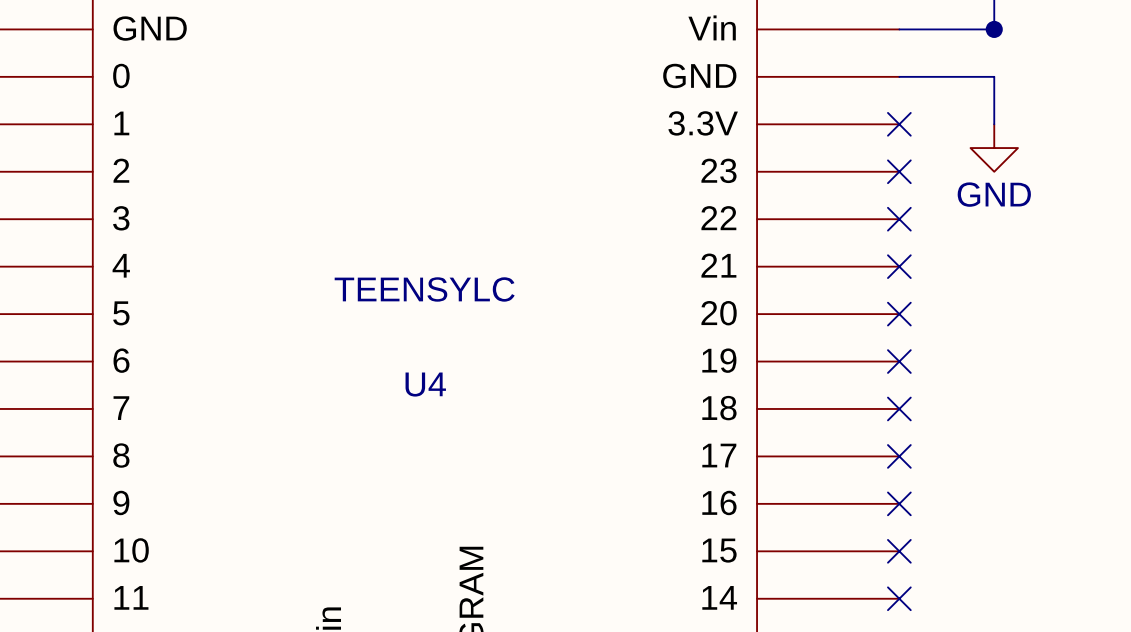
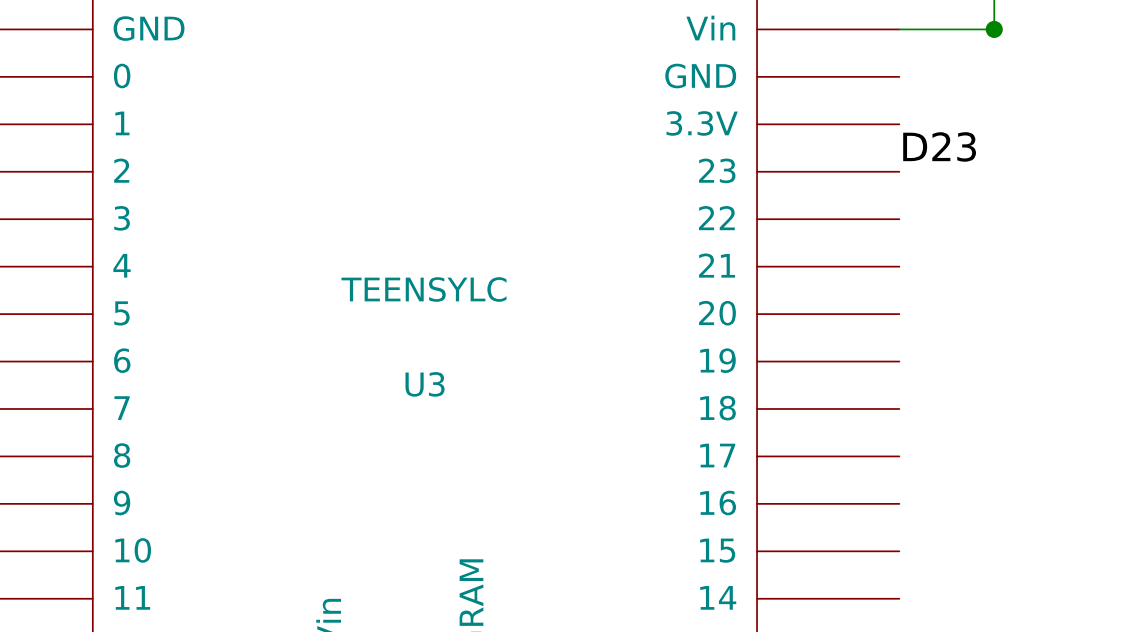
wire: (899, 76) (994, 76) (994, 124) -> none
no-connect mark: (899, 124) -> none
label: none -> D23 (939, 146)
power symbol: GND (994, 148) -> none
no-connect mark: (899, 171) -> none
no-connect mark: (899, 219) -> none
no-connect mark: (899, 266) -> none
no-connect mark: (899, 314) -> none
no-connect mark: (899, 361) -> none
U4 name: U4 (425, 384) -> U3 (425, 384)
no-connect mark: (899, 408) -> none
no-connect mark: (899, 456) -> none
no-connect mark: (899, 503) -> none
no-connect mark: (899, 551) -> none
no-connect mark: (899, 598) -> none

